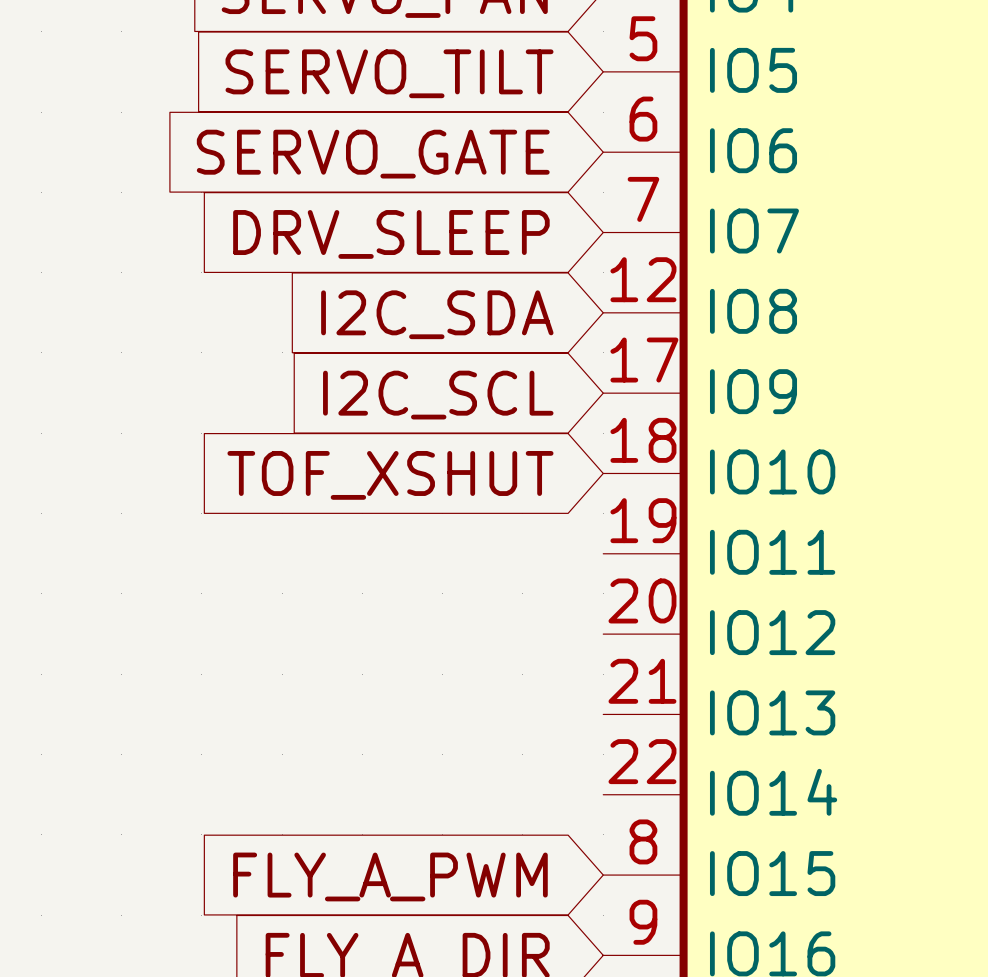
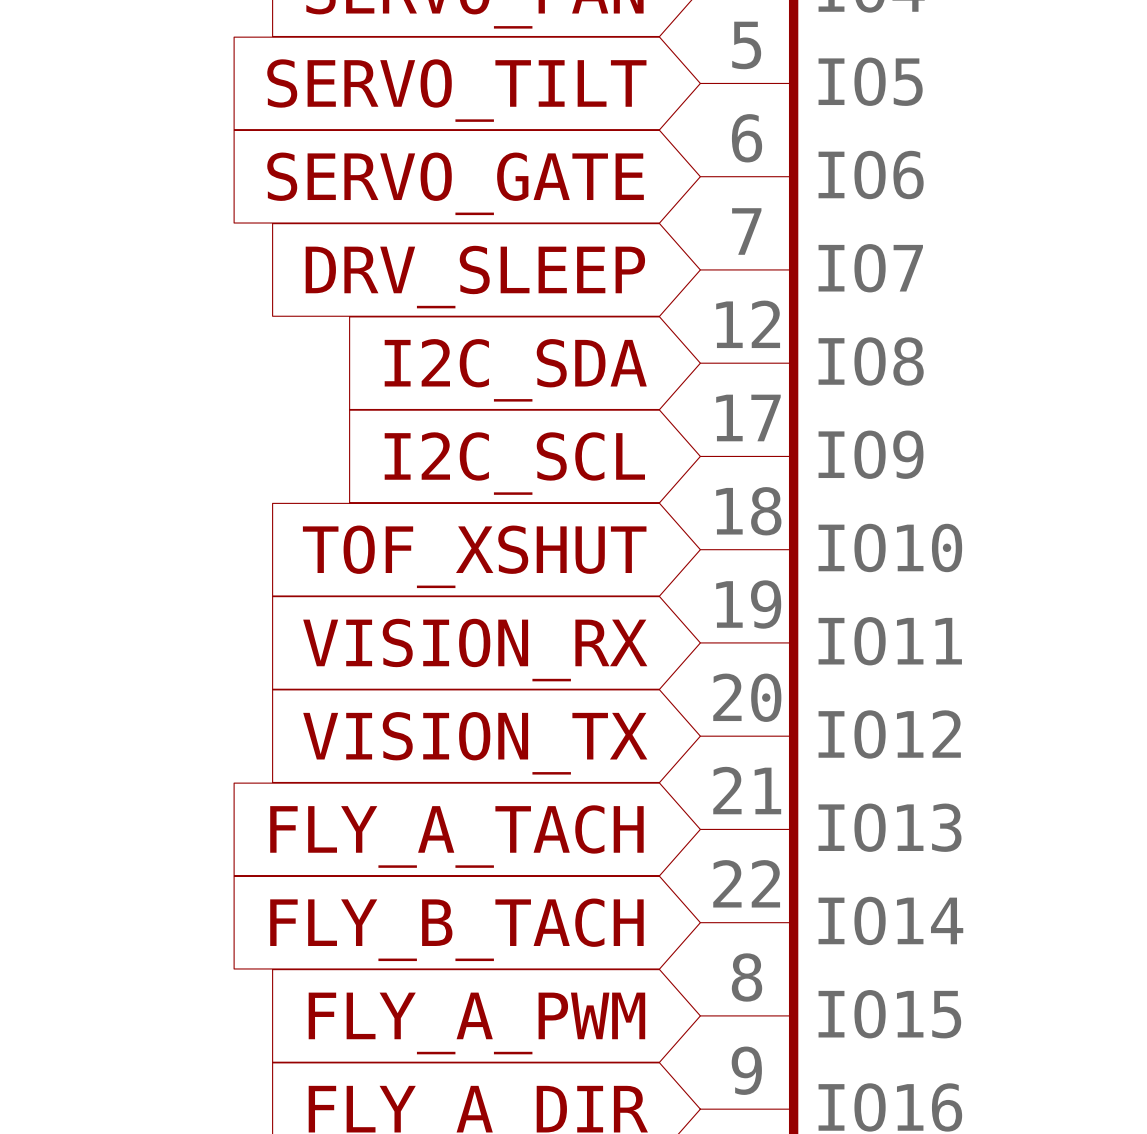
global label: none -> VISION_RX (475, 650)
global label: none -> VISION_TX (475, 743)
global label: none -> FLY_A_TACH (456, 836)
global label: none -> FLY_B_TACH (456, 929)

